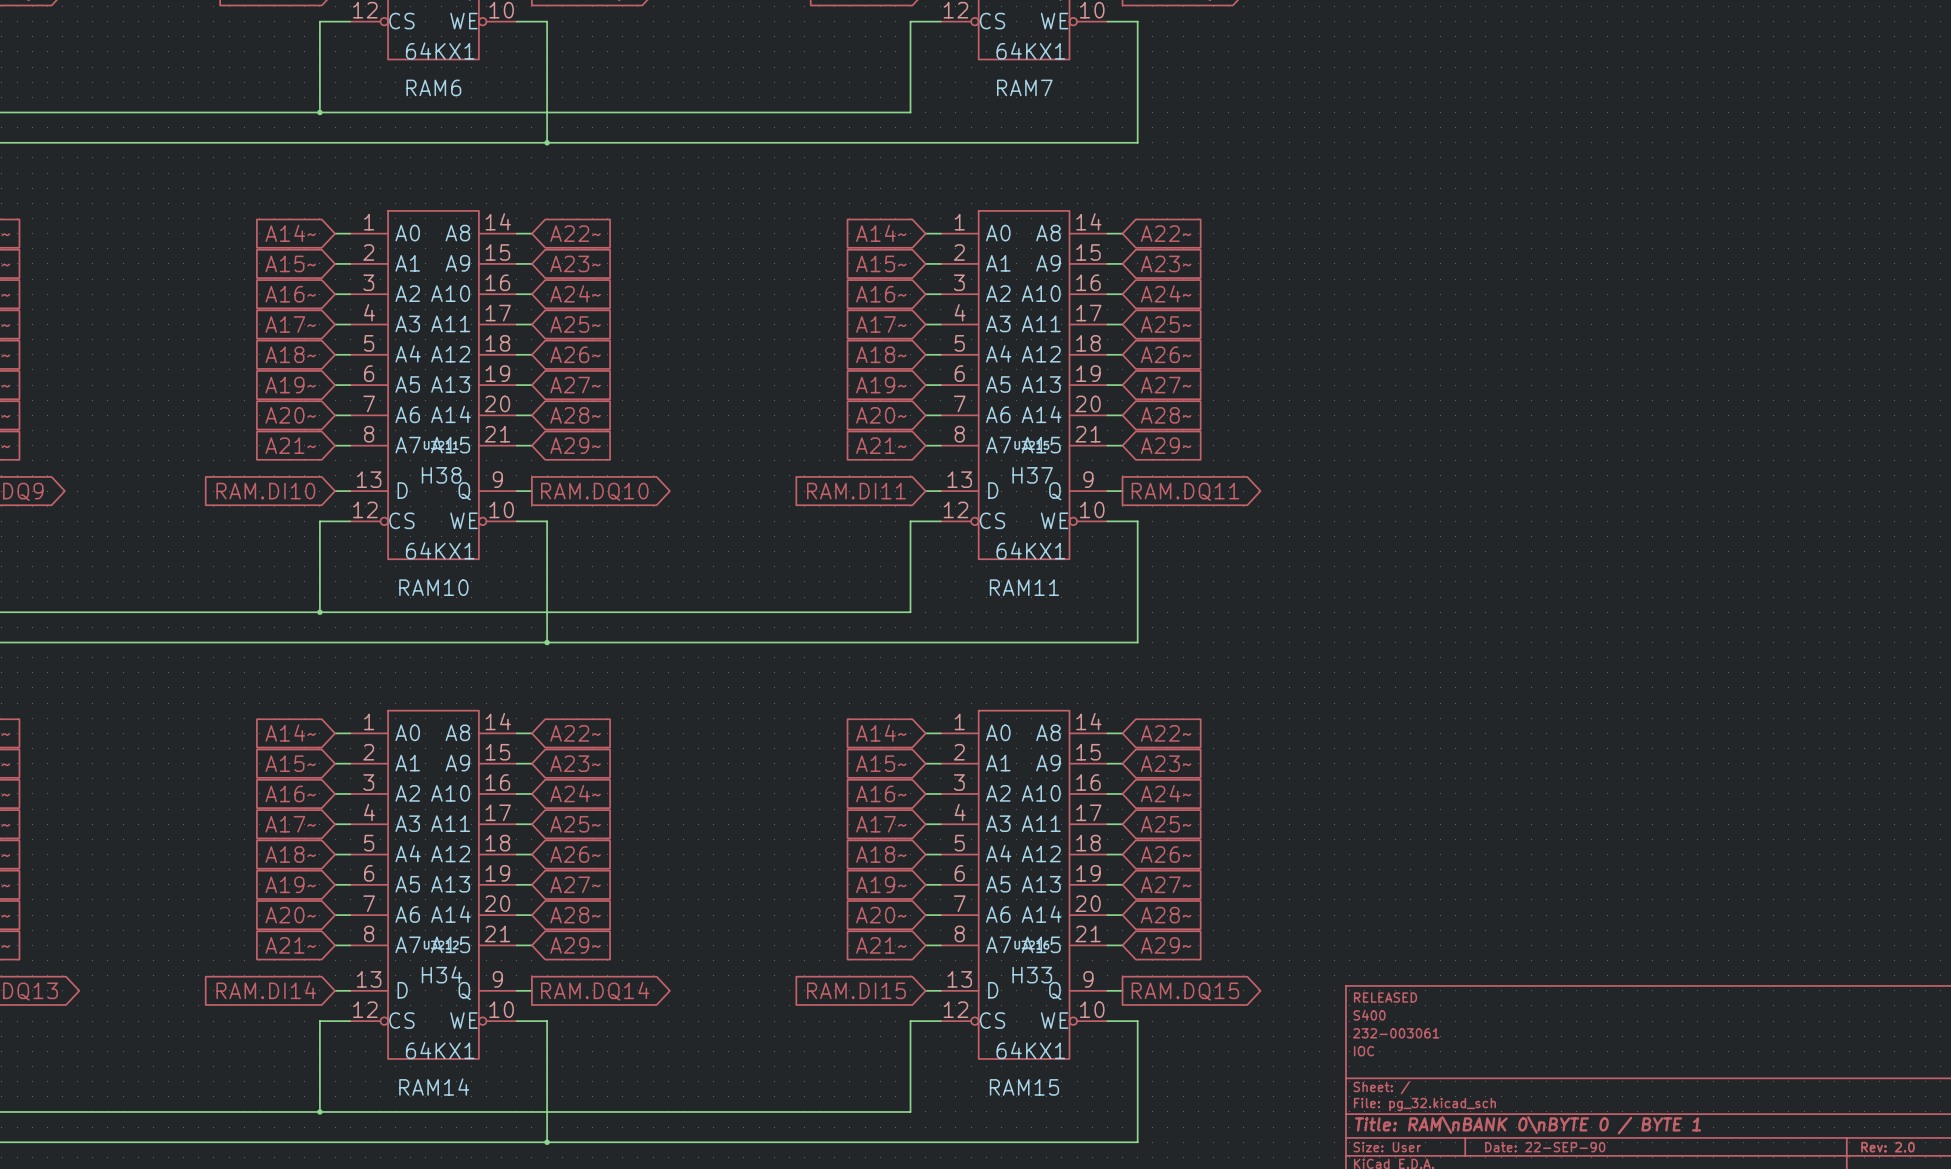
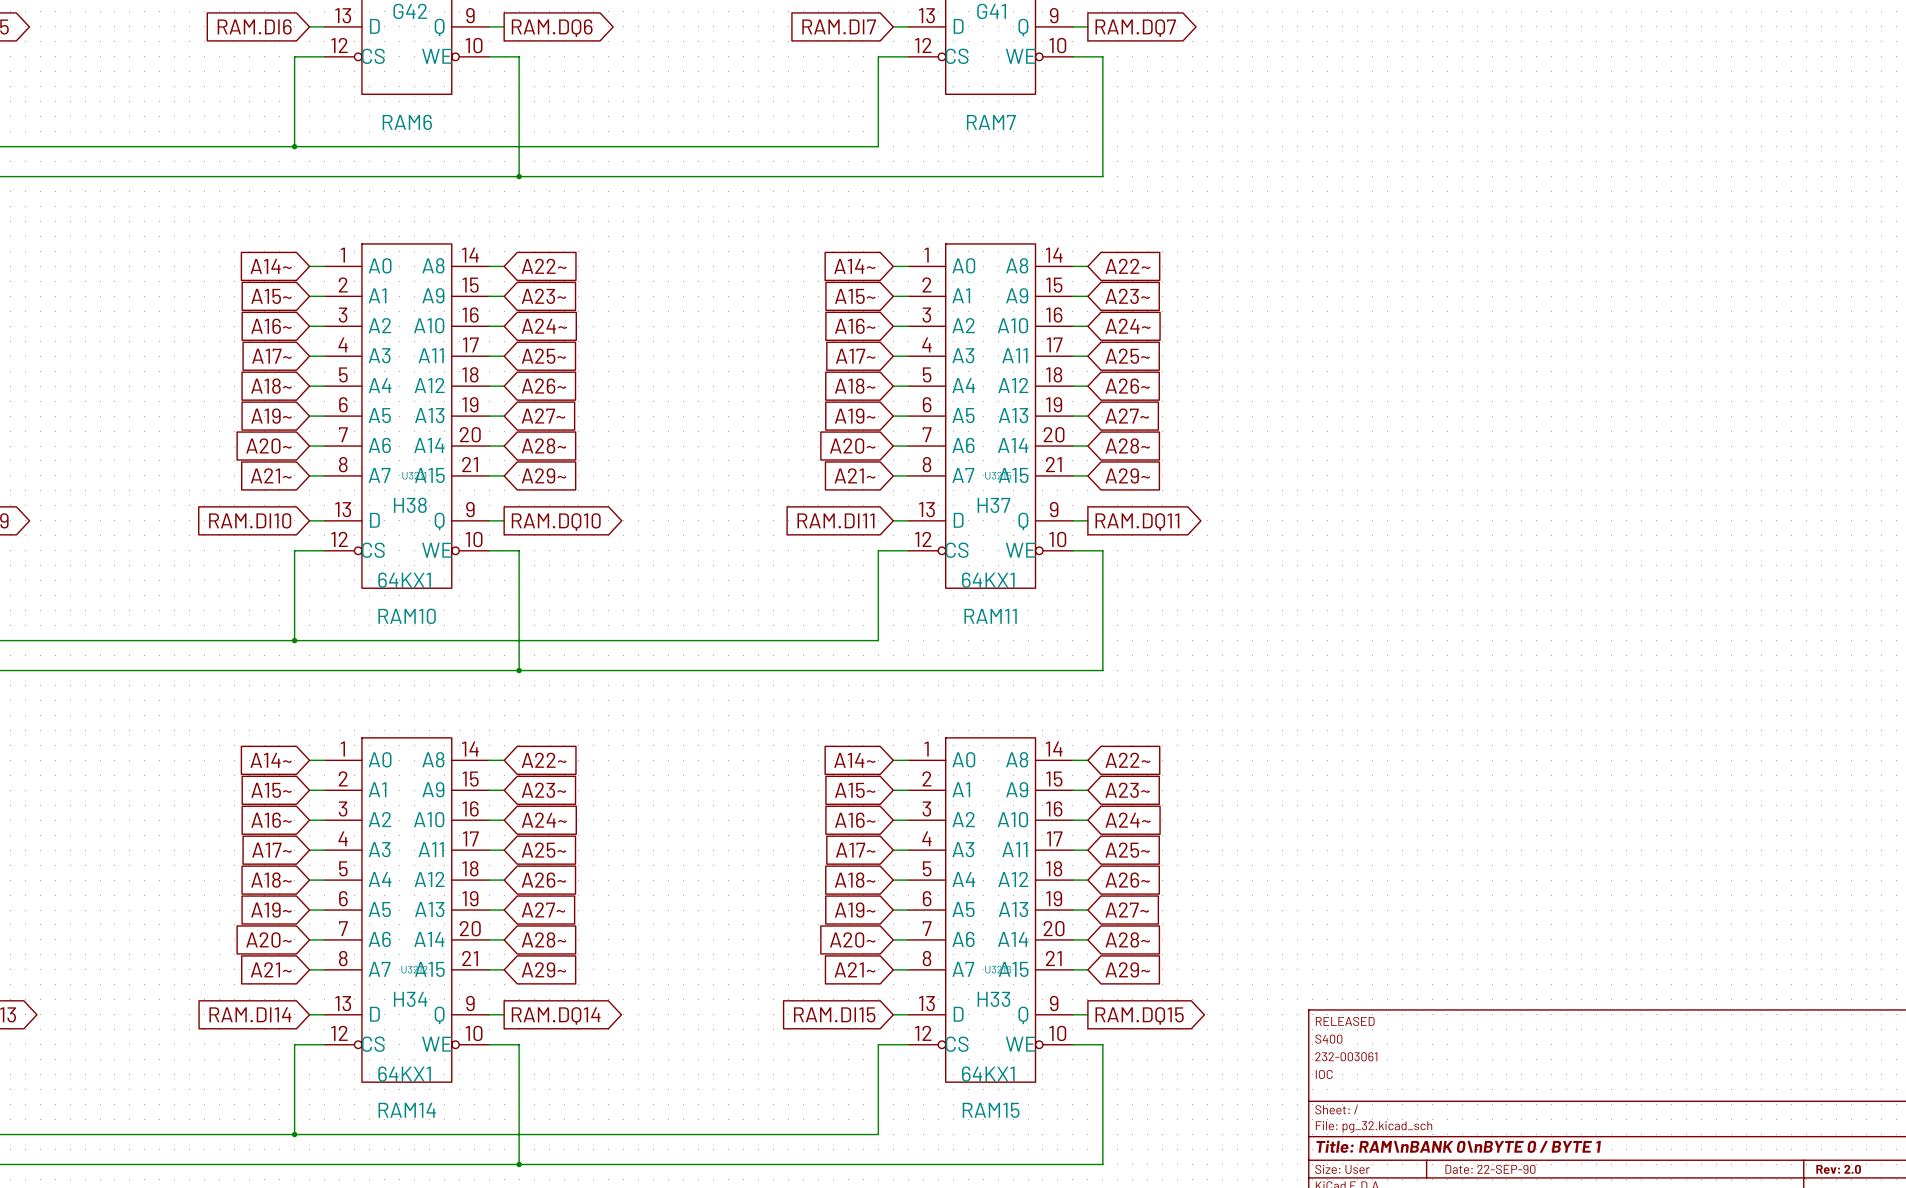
part value: 64KX1 (440, 50) -> none
part value: 64KX1 (1030, 50) -> none

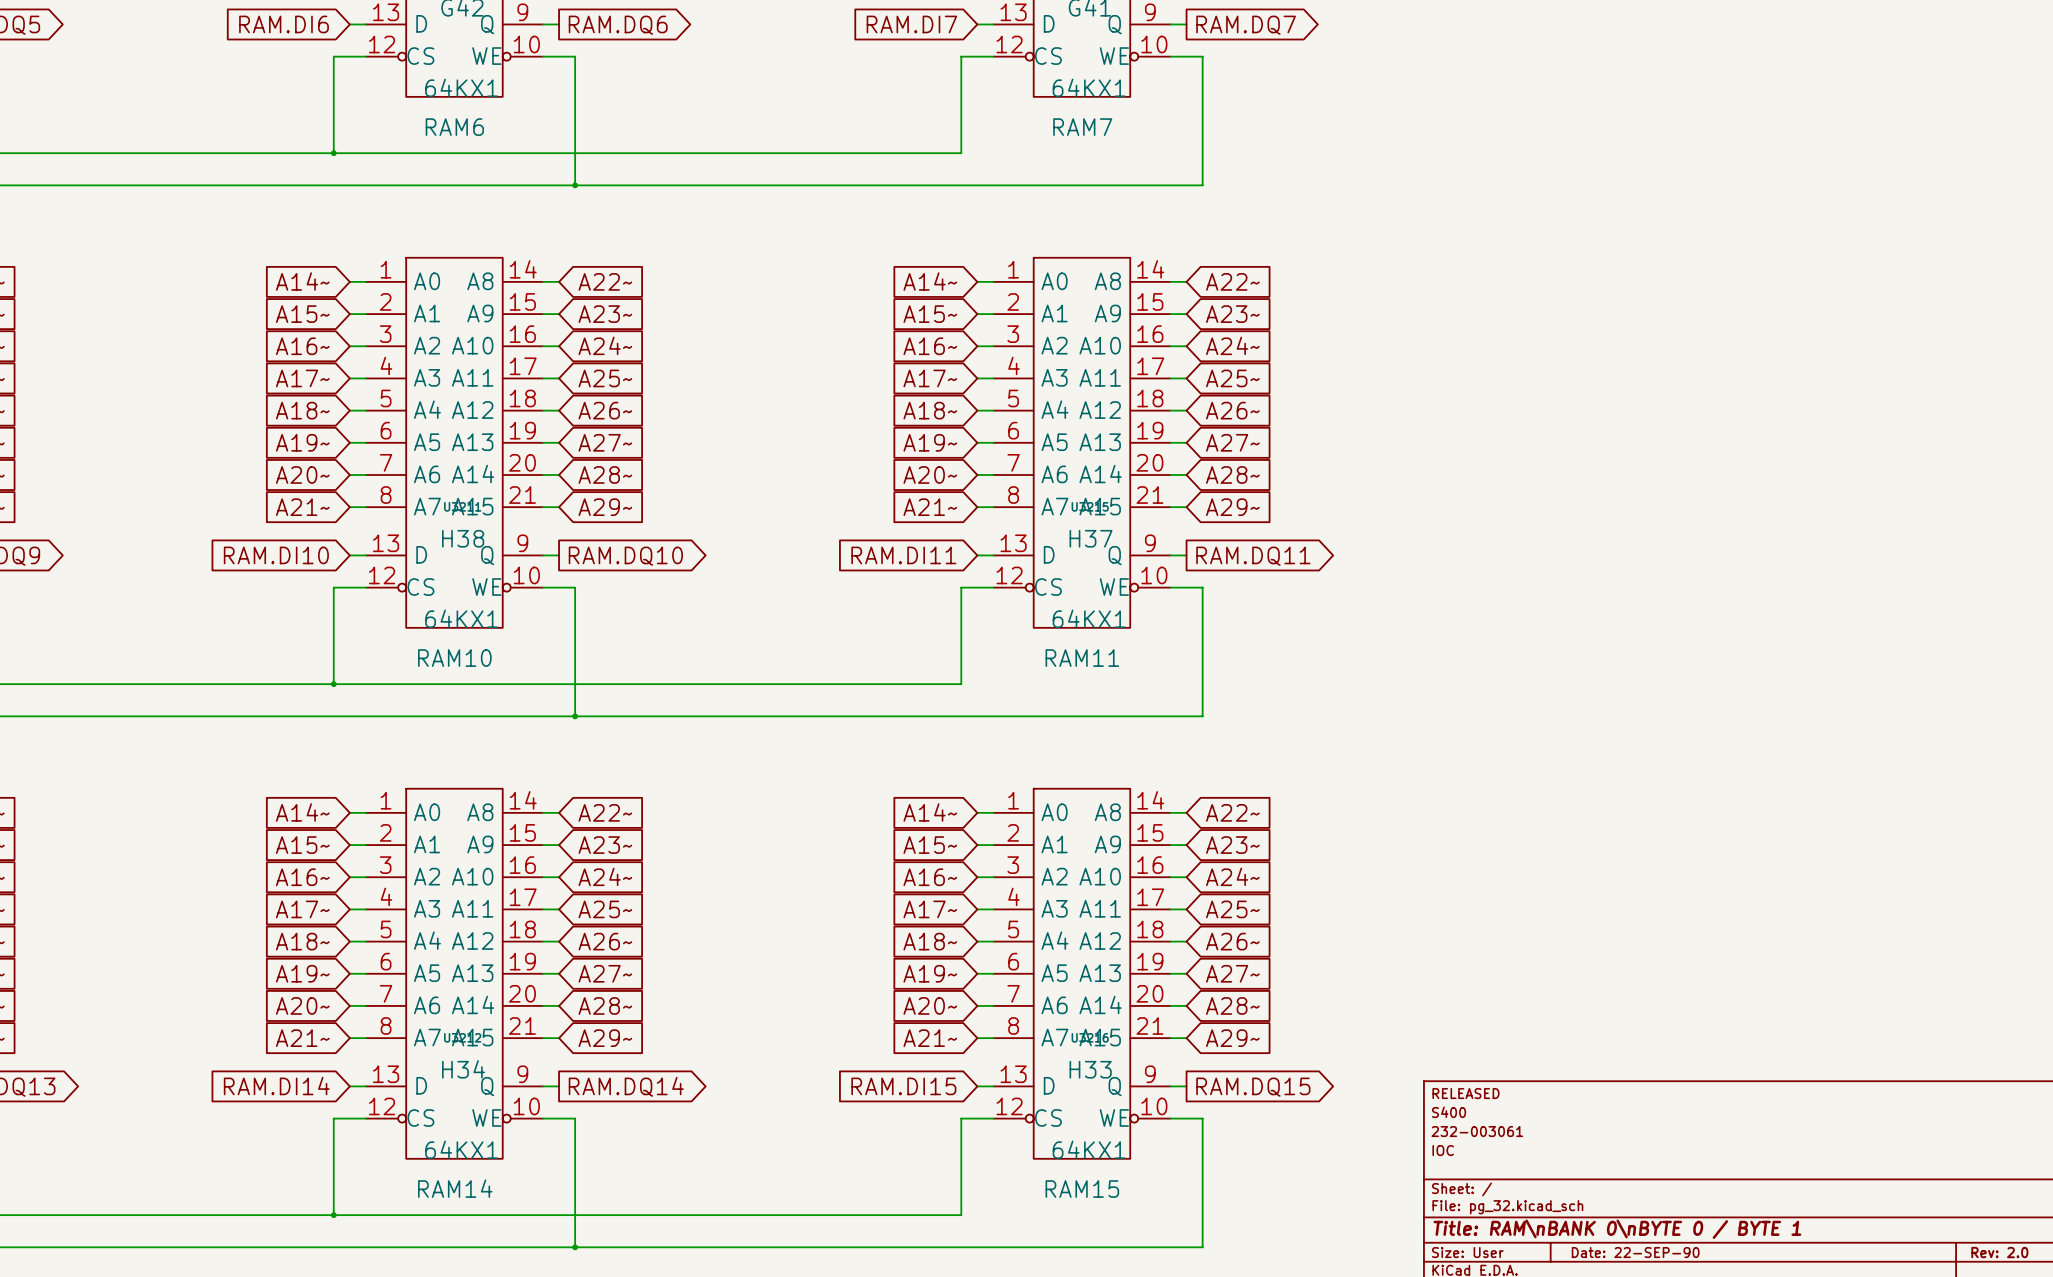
part value: none -> 64KX1 (461, 87)
part value: none -> 64KX1 (1089, 87)

